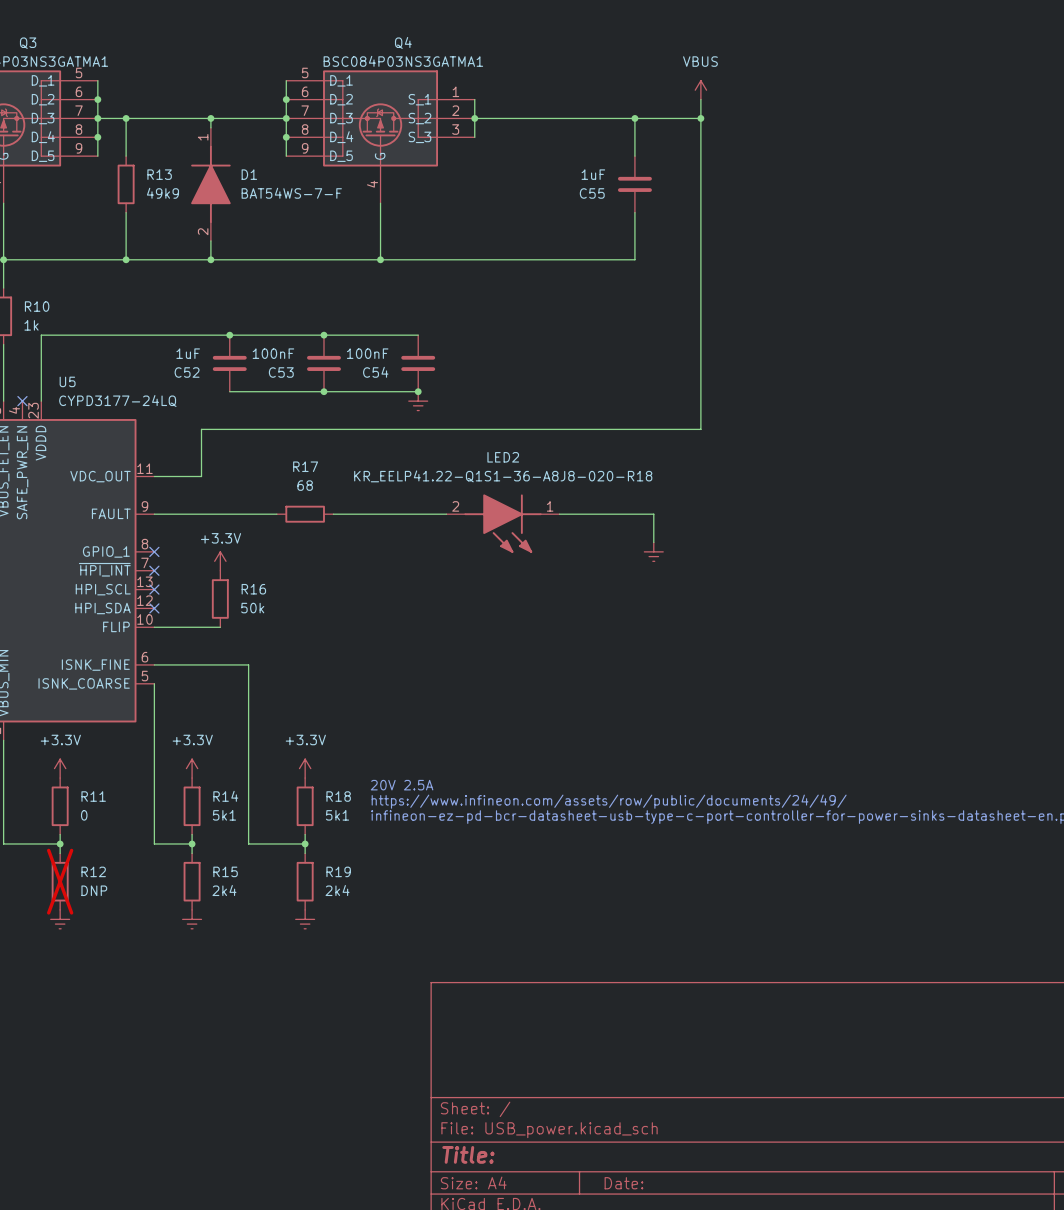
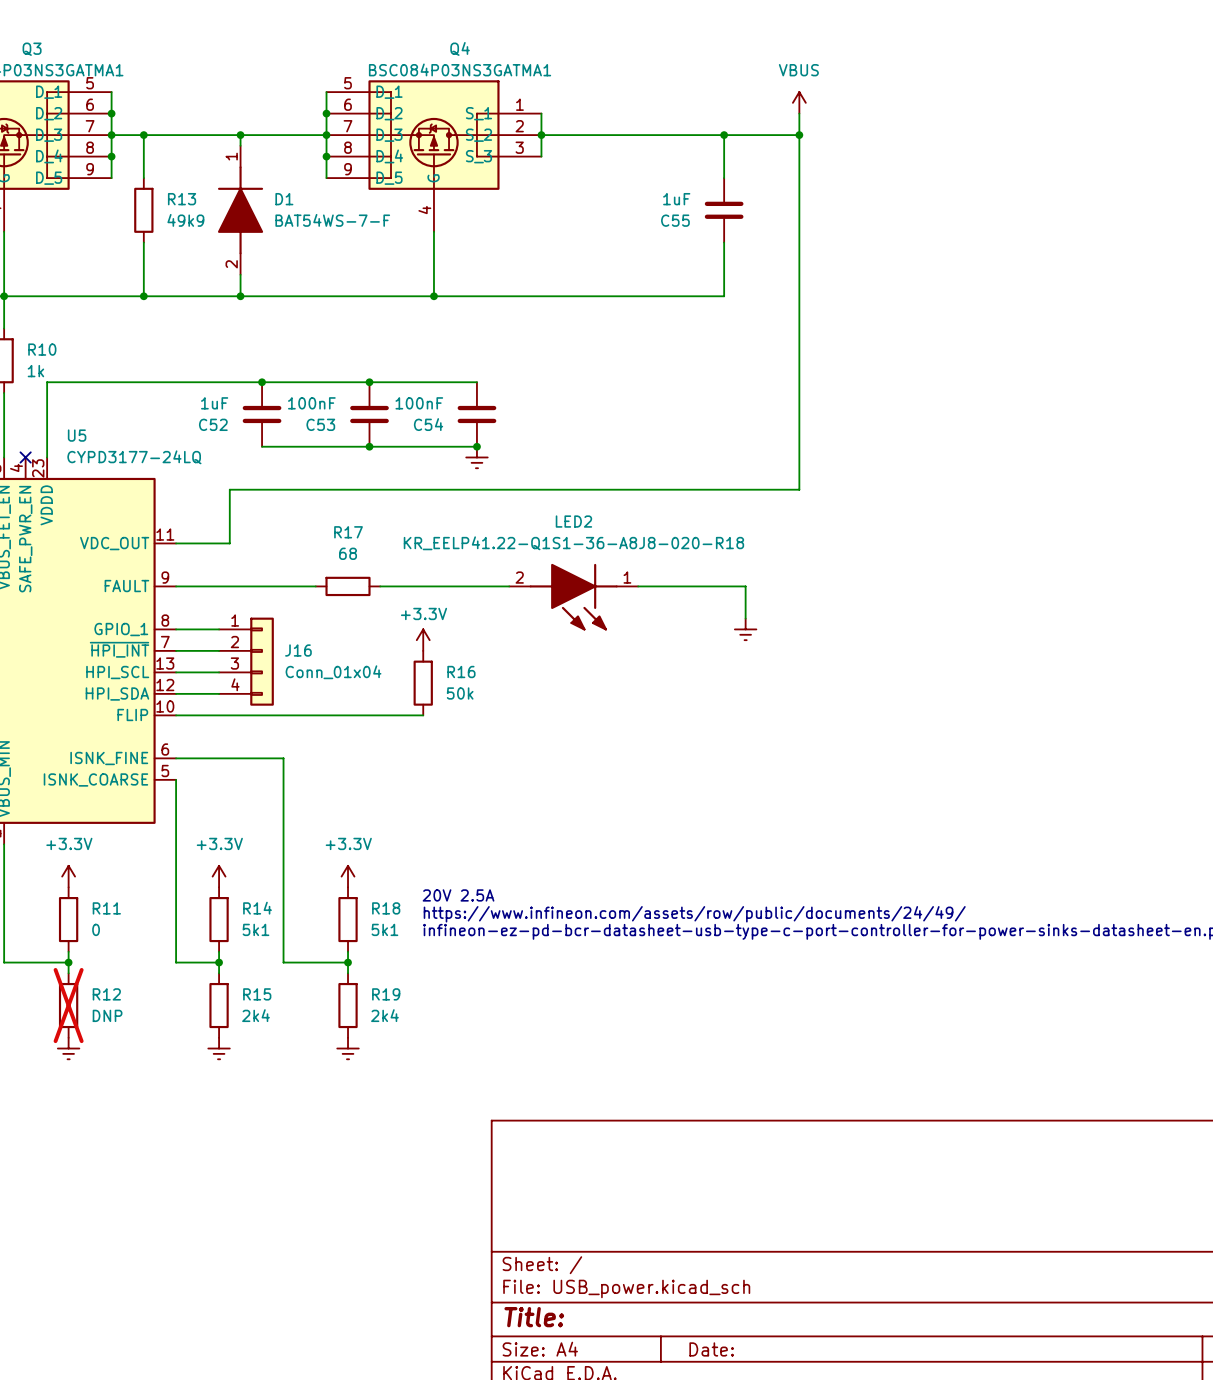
wire: none -> (176, 629) (219, 629)
no-connect mark: (154, 551) -> none
power symbol position: +3.3V (220, 561) -> +3.3V (423, 640)
wire: none -> (176, 650) (219, 650)
no-connect mark: (154, 570) -> none
J16: none -> Conn_01x04 (246, 661)
wire: none -> (176, 672) (219, 672)
no-connect mark: (154, 589) -> none
R16 position: (220, 599) -> (423, 683)
wire: none -> (176, 693) (219, 693)
no-connect mark: (154, 608) -> none
wire: none -> (251, 715) (423, 715)

